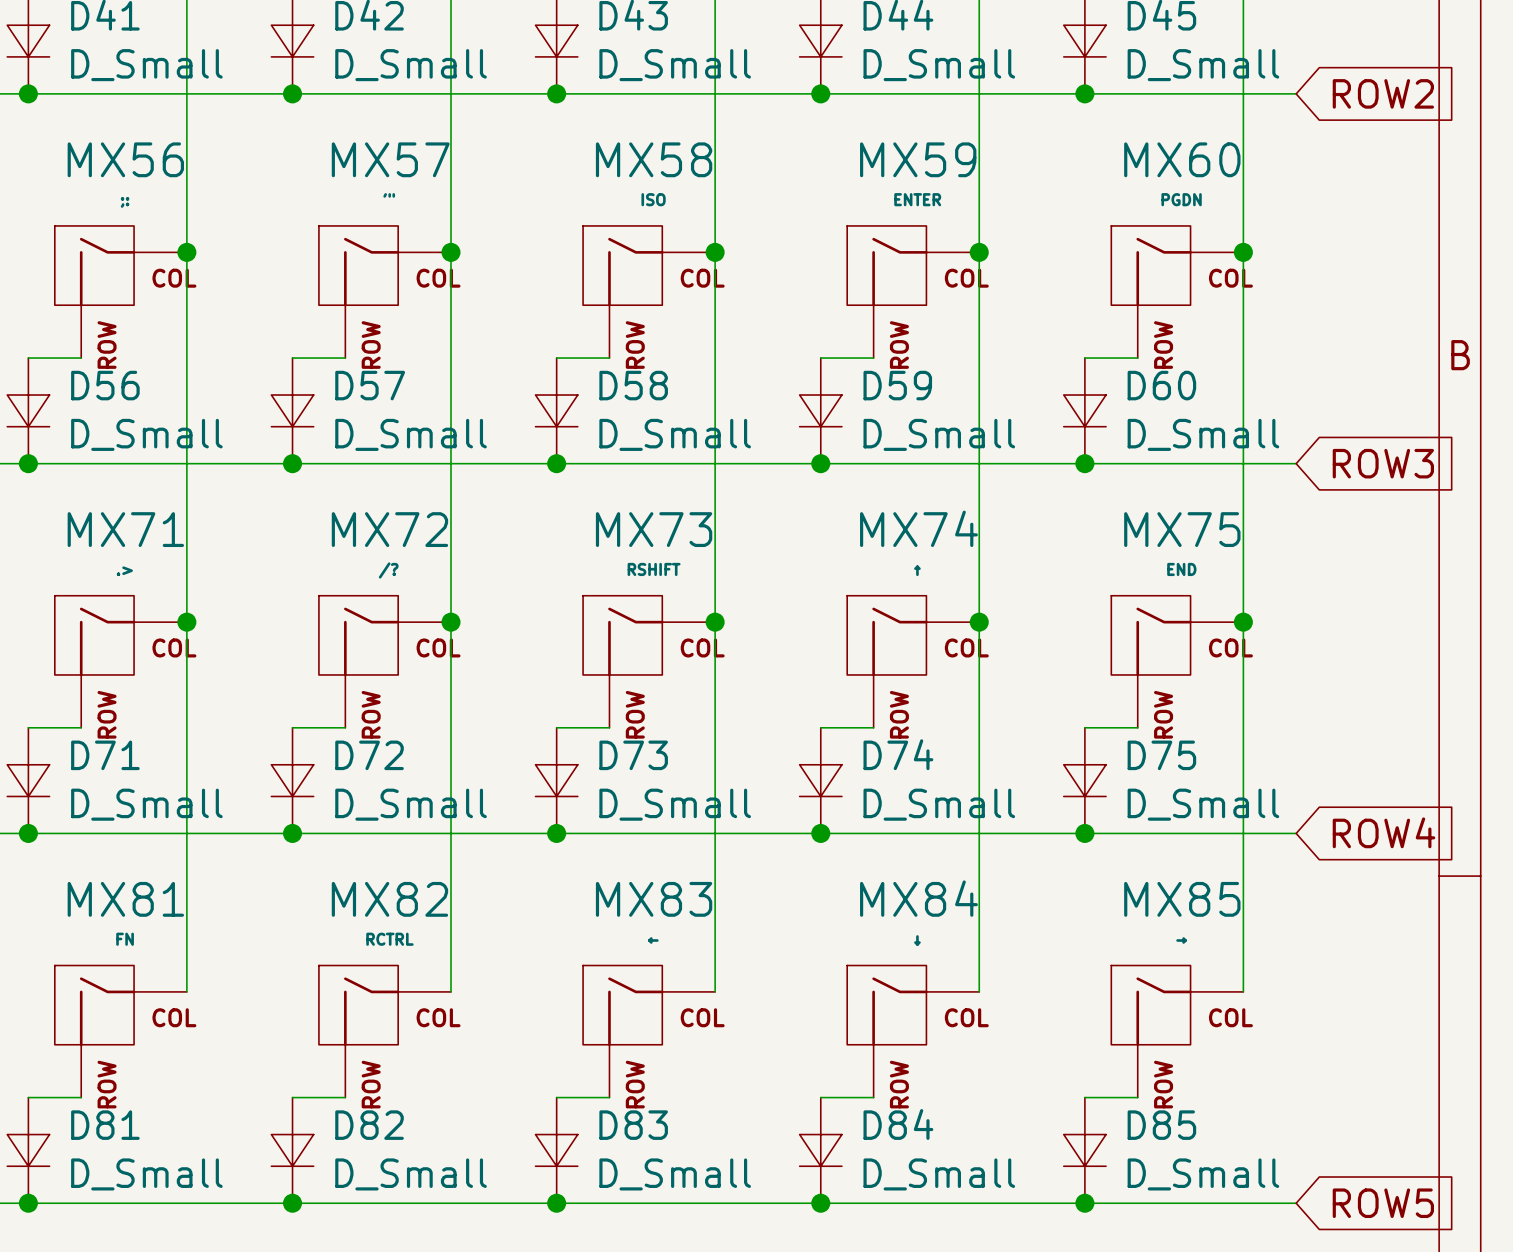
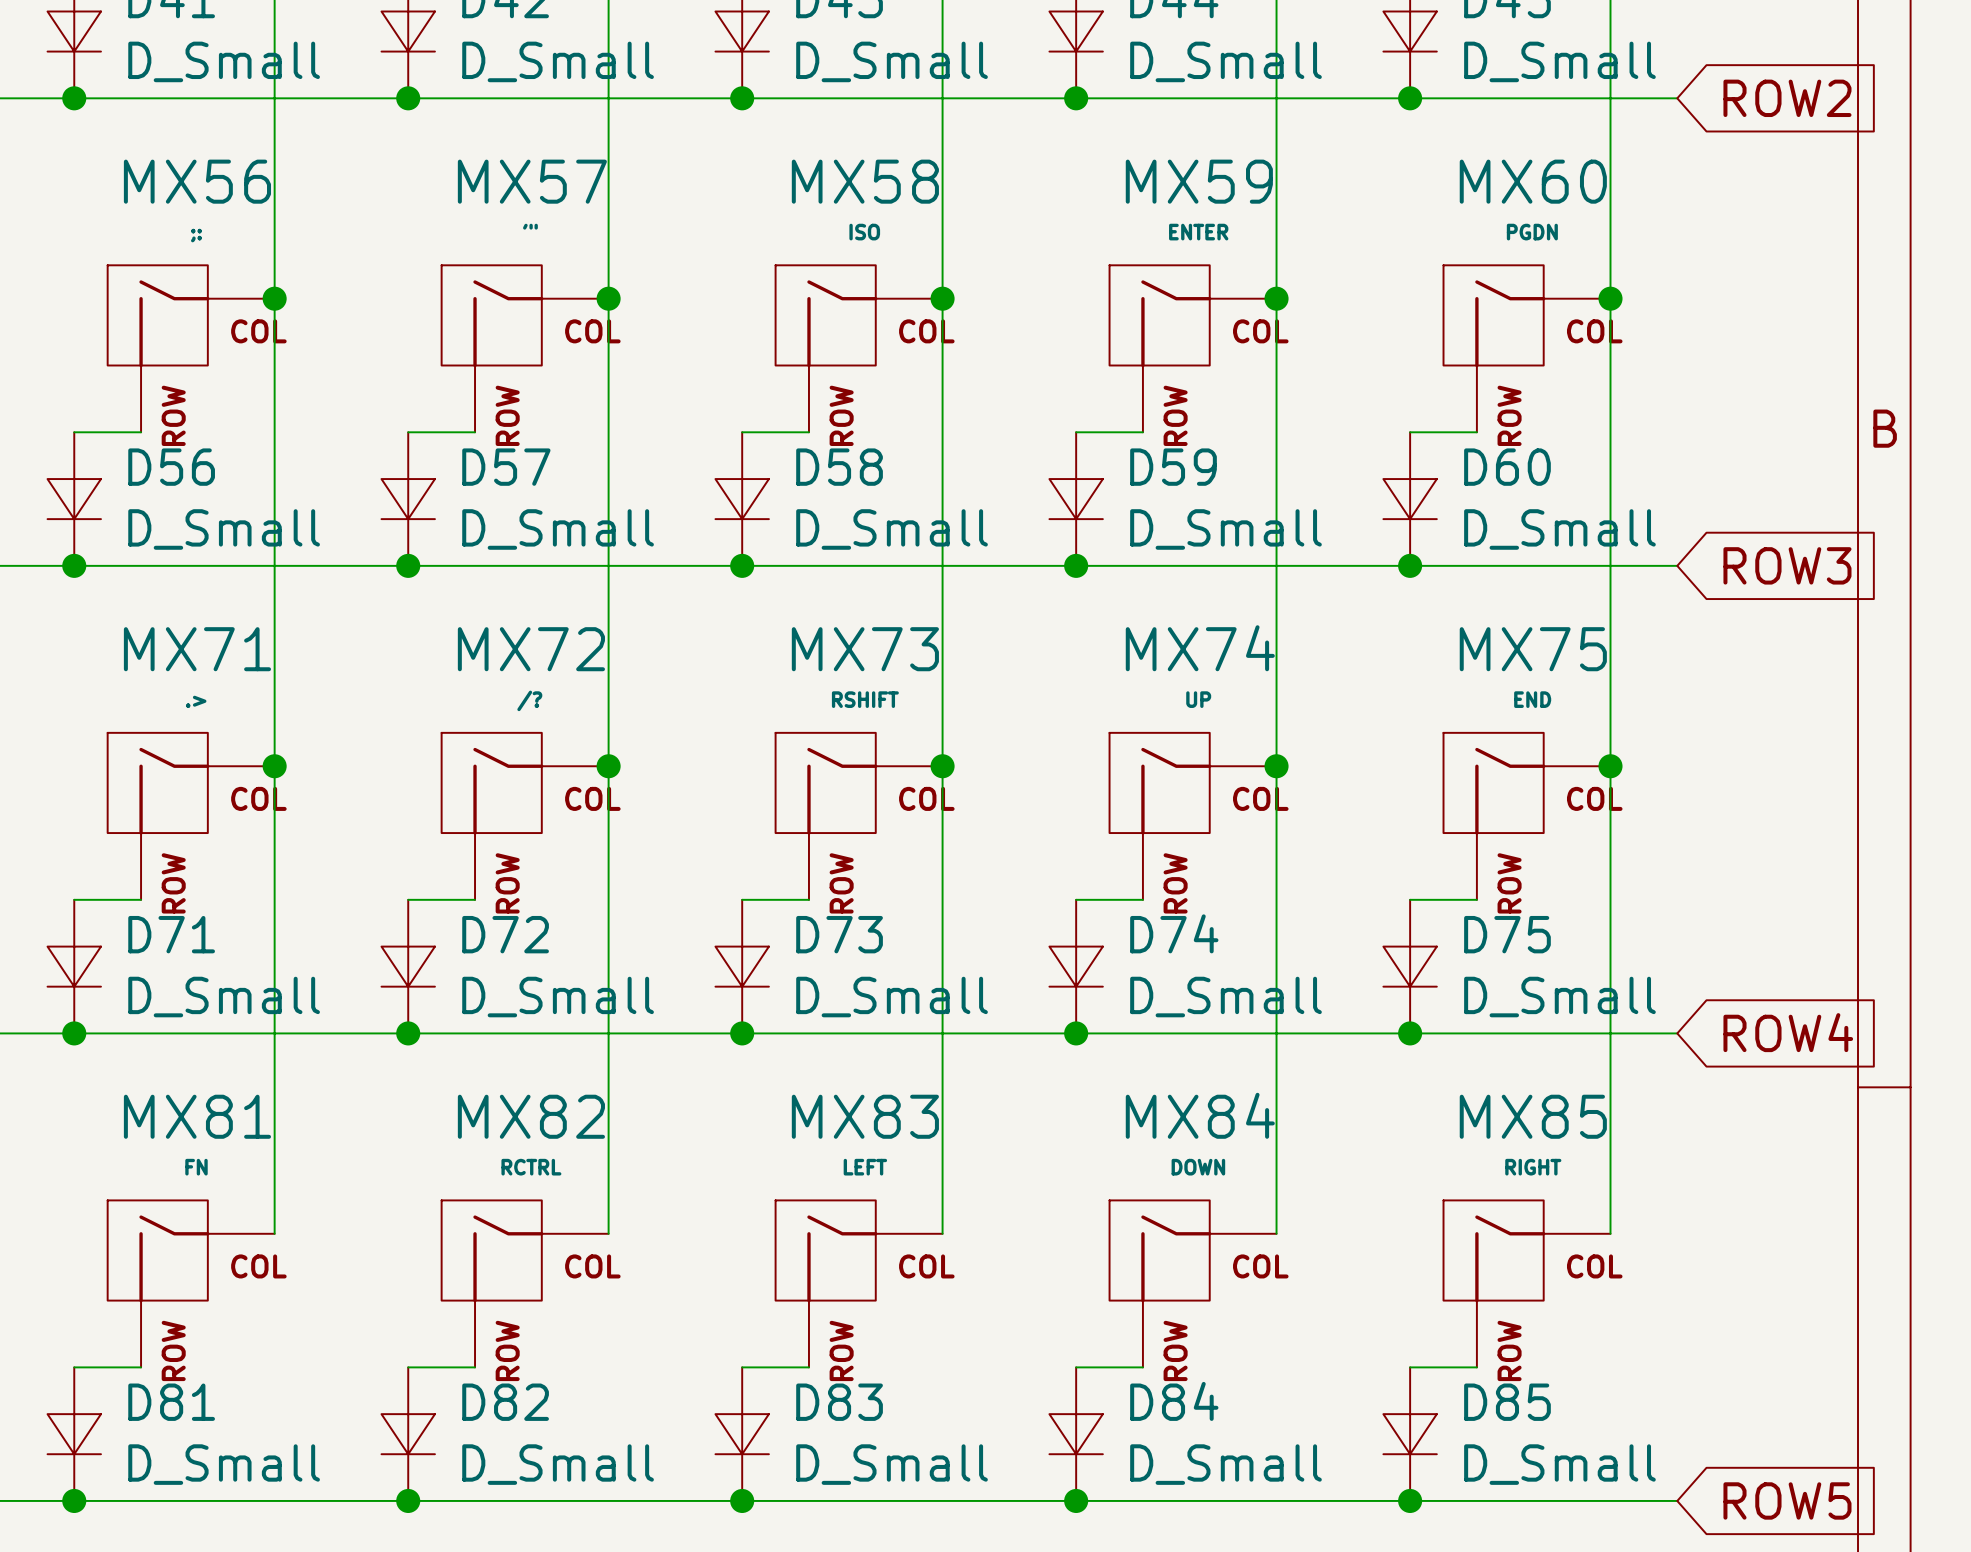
MX74 value: ↑ (917, 570) -> UP (1198, 699)
MX83 value: ← (653, 940) -> LEFT (865, 1167)
MX84 value: ↓ (917, 940) -> DOWN (1198, 1167)
MX85 value: → (1181, 940) -> RIGHT (1533, 1167)

